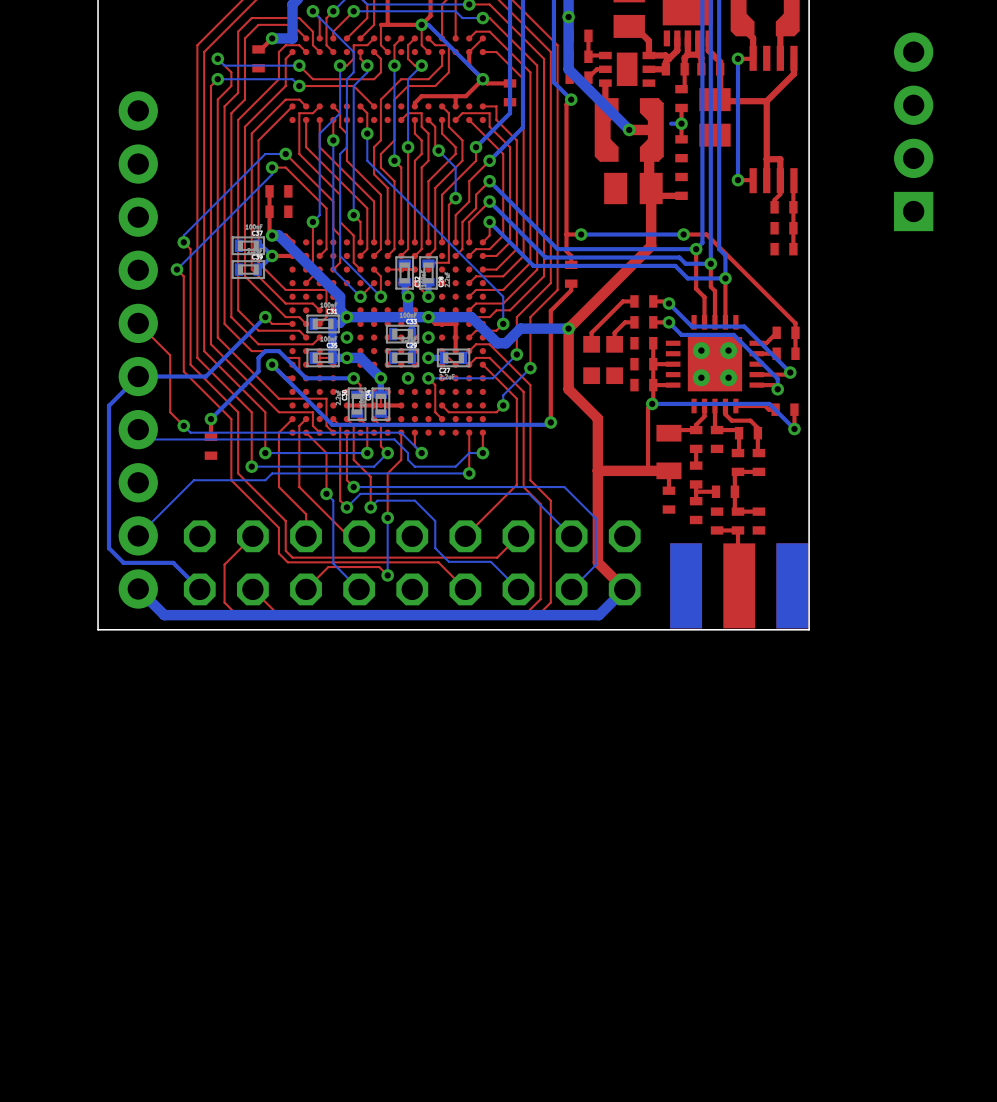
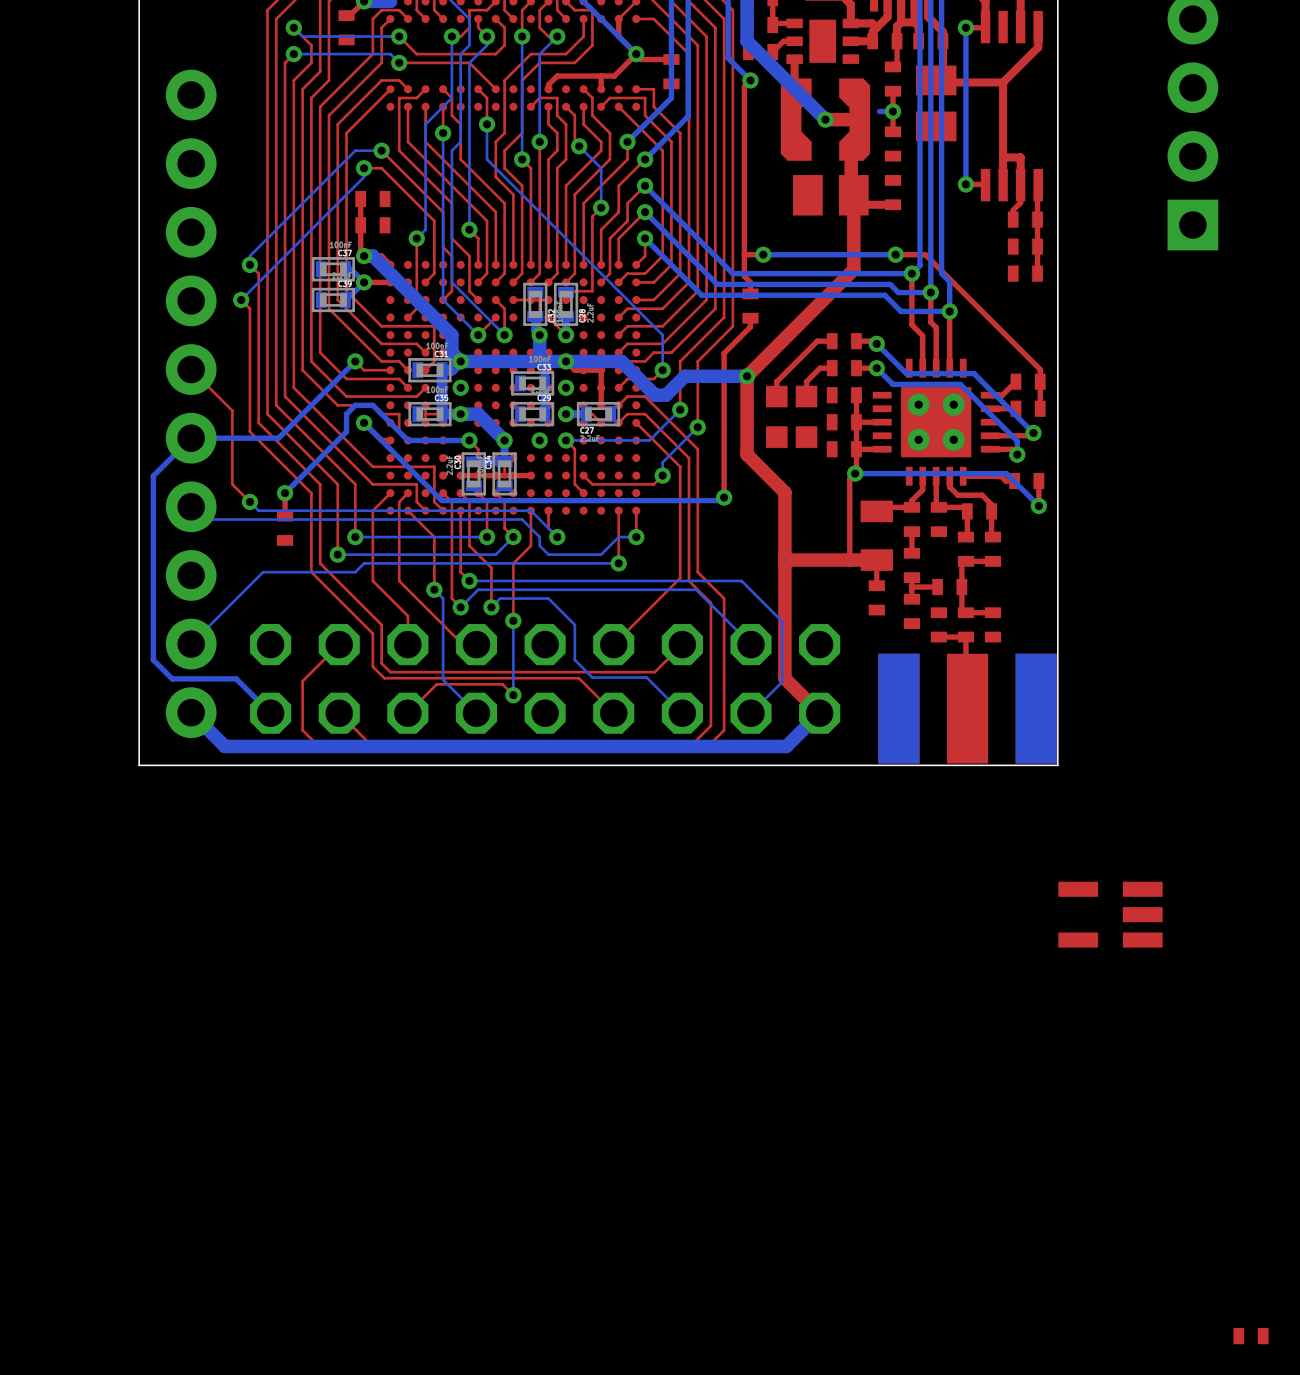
part: none -> (1110, 914)
part: none -> (1250, 1336)

